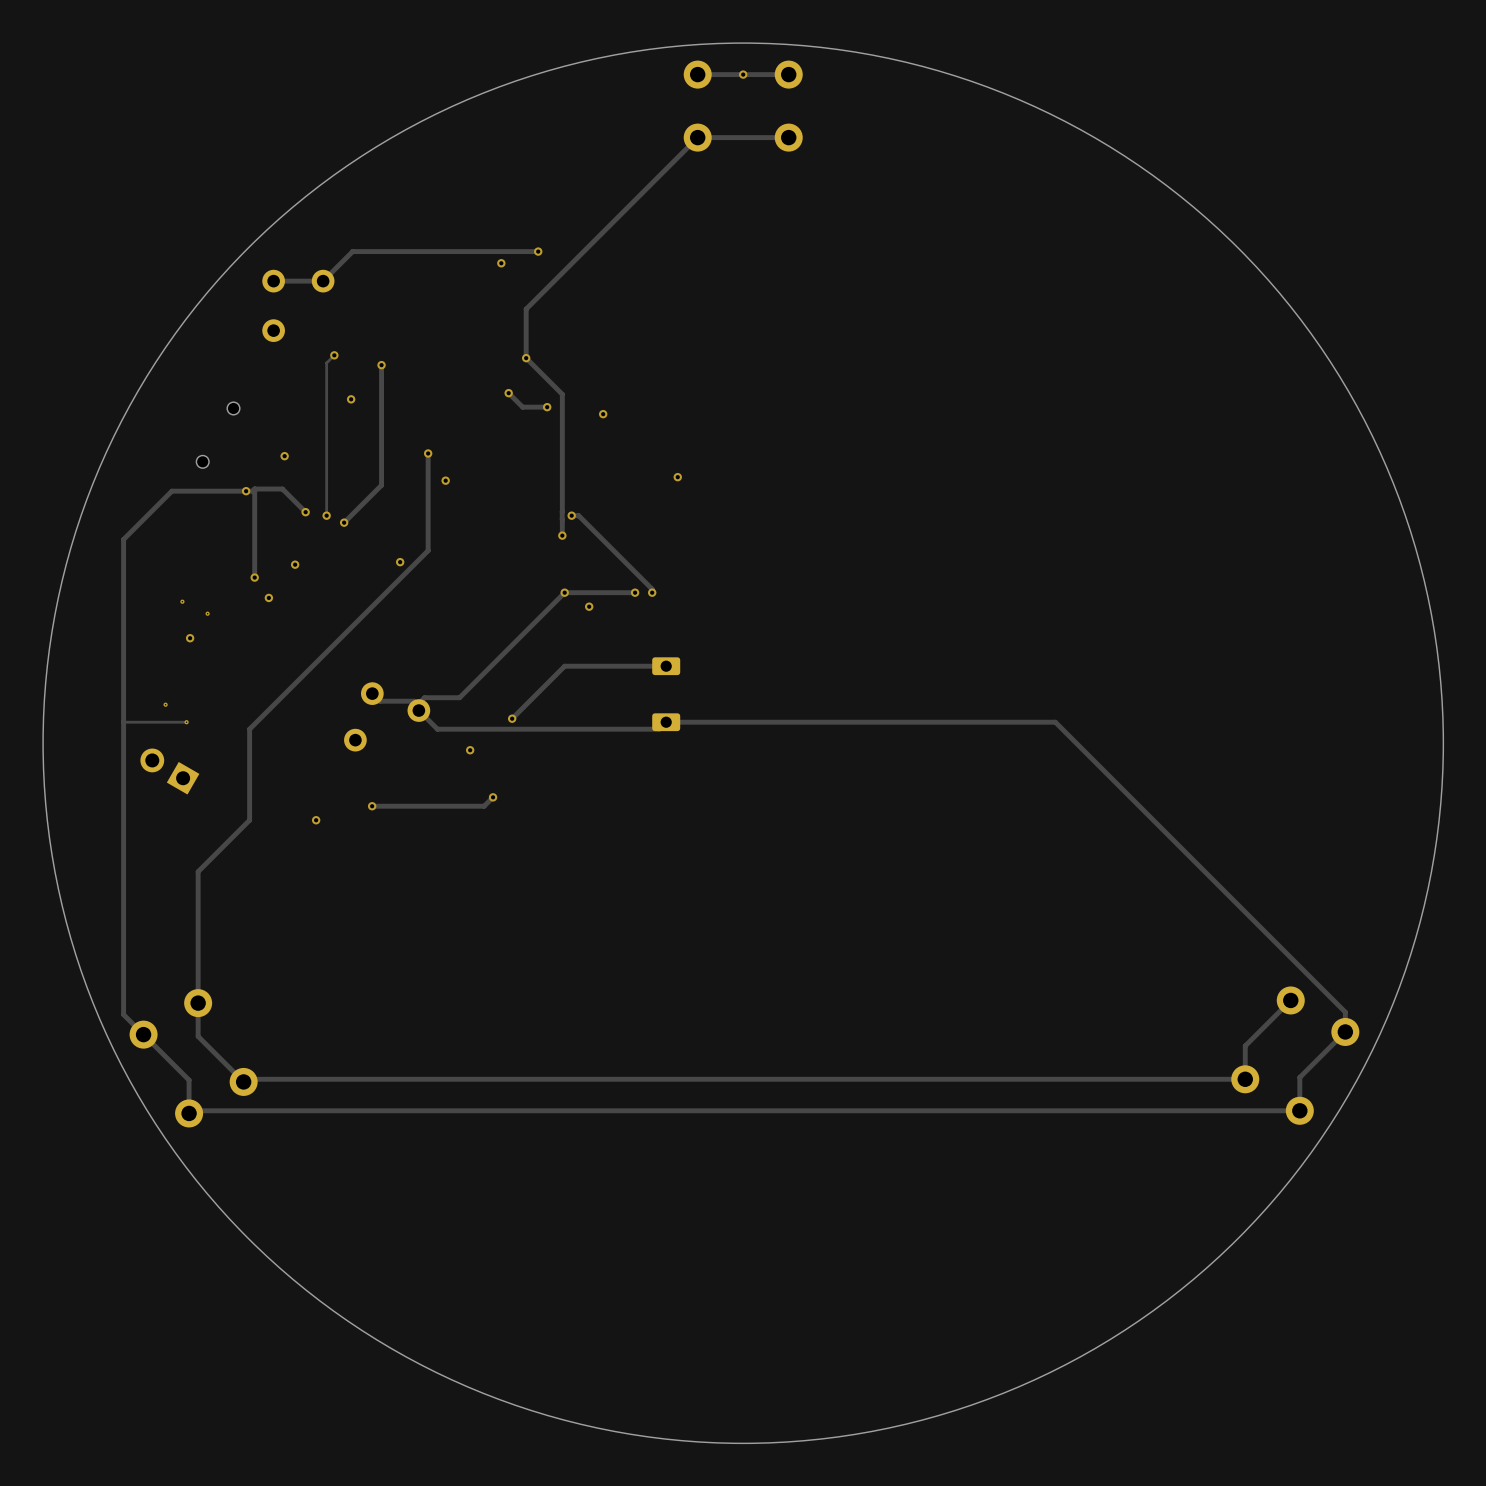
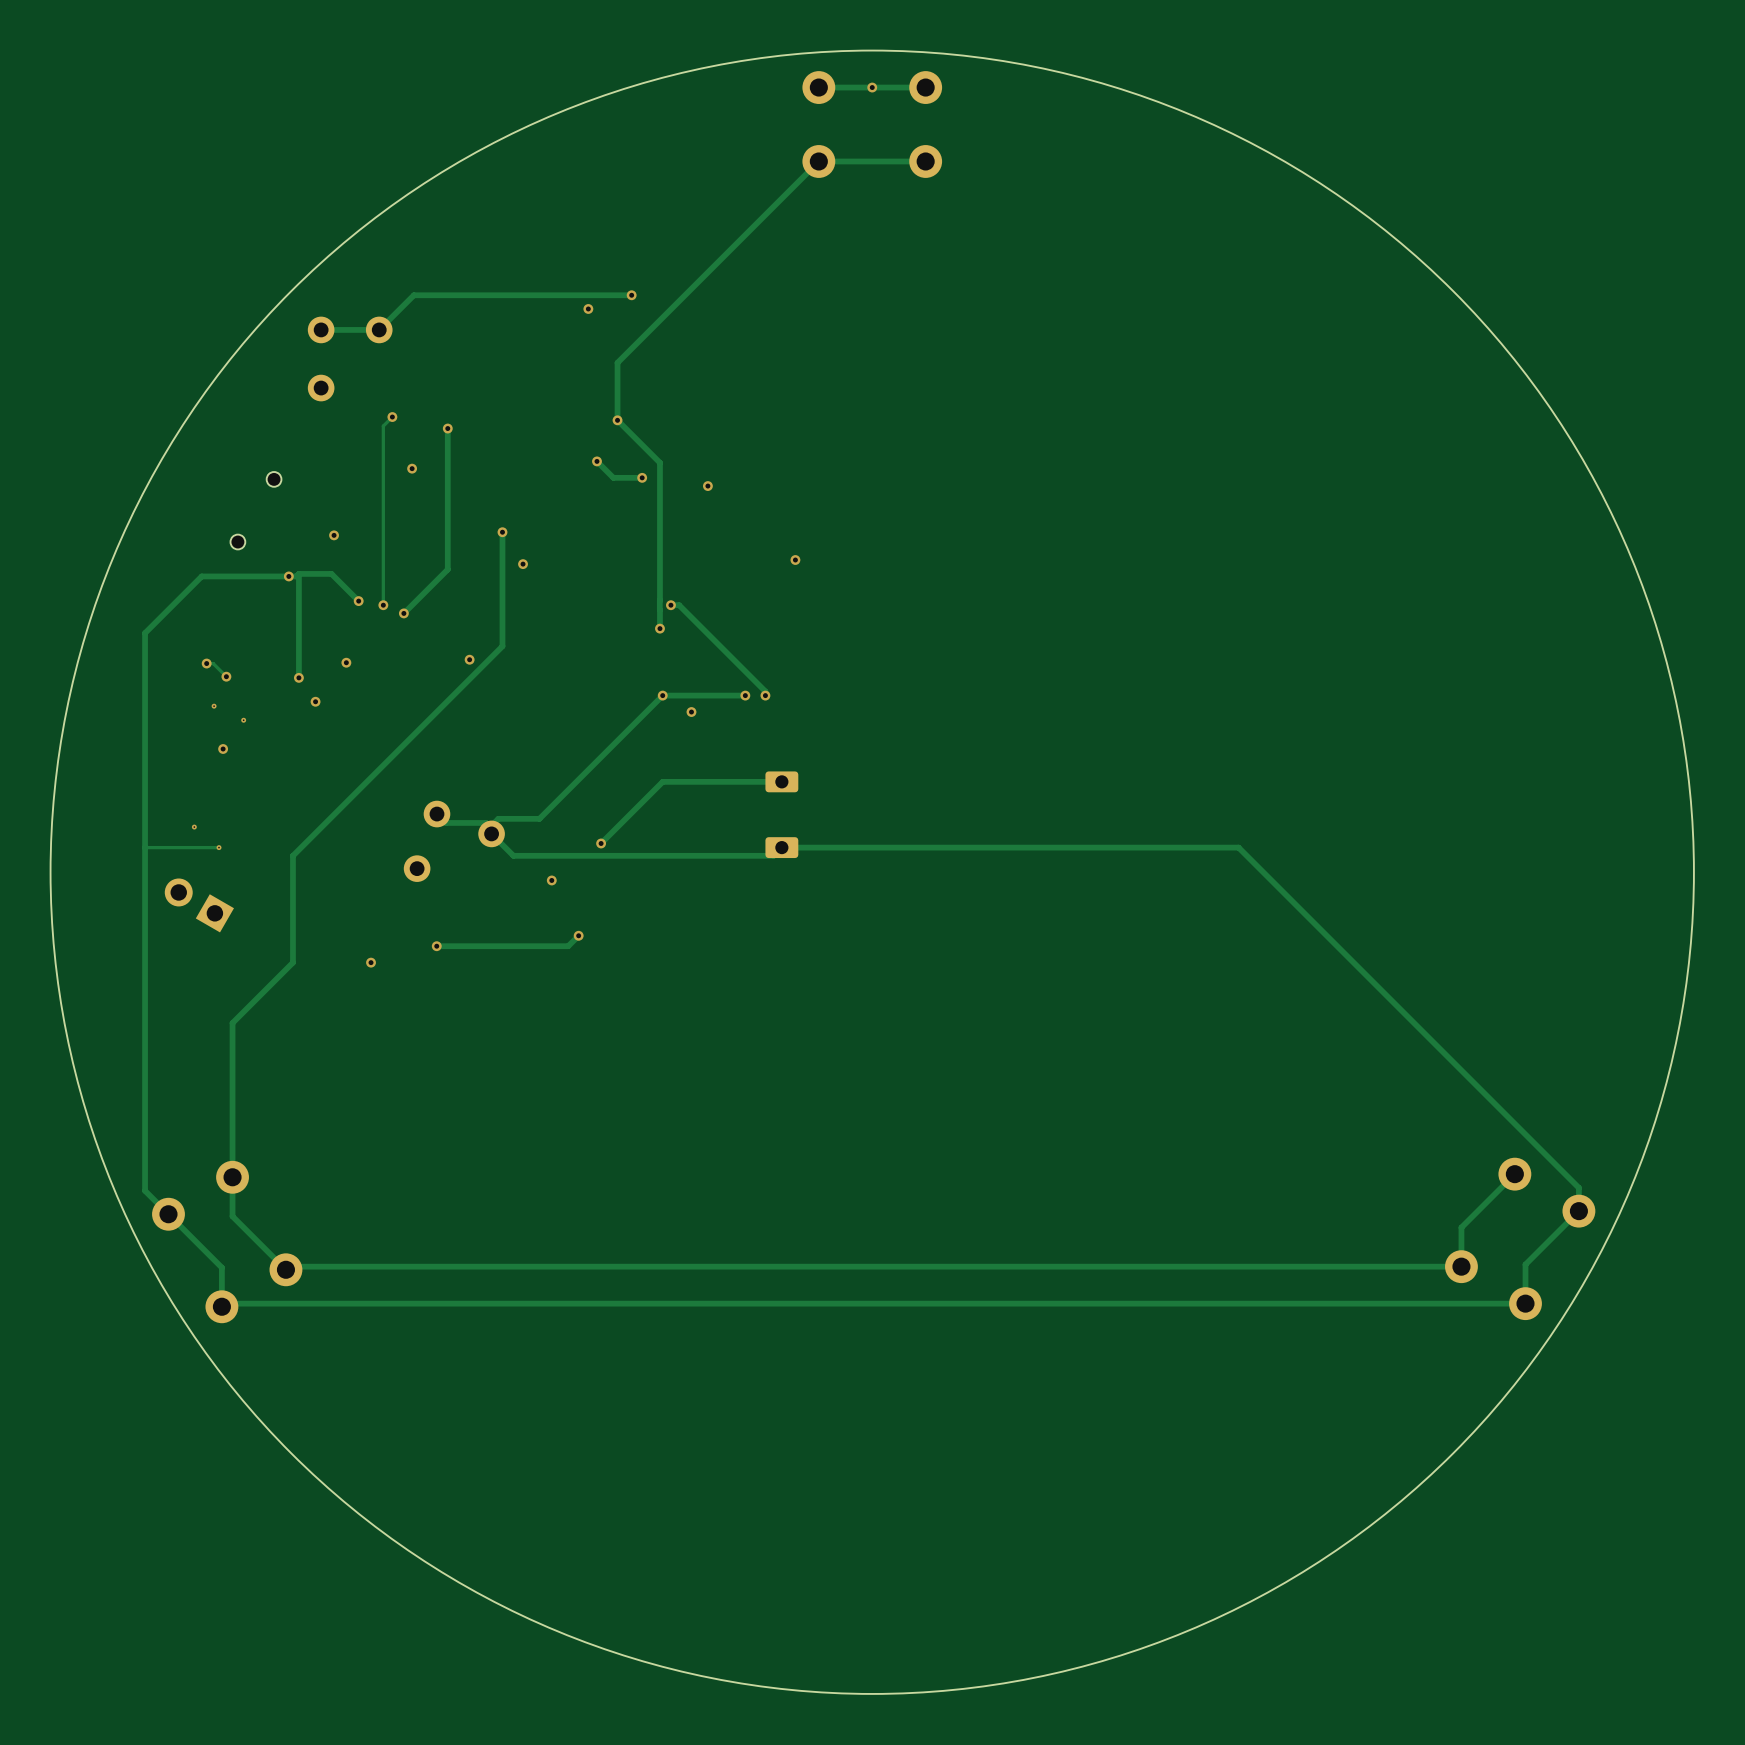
track: none -> (206, 663) (213, 663) (226, 676)
via: none -> (206, 663)
via: none -> (226, 676)

